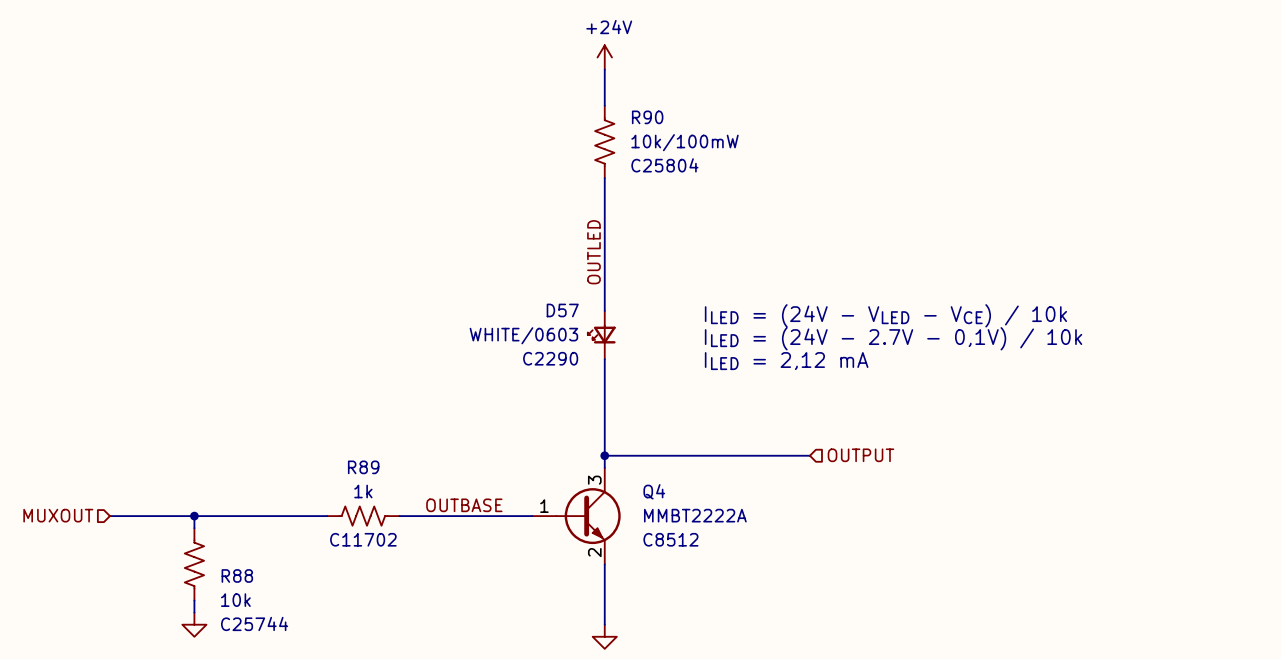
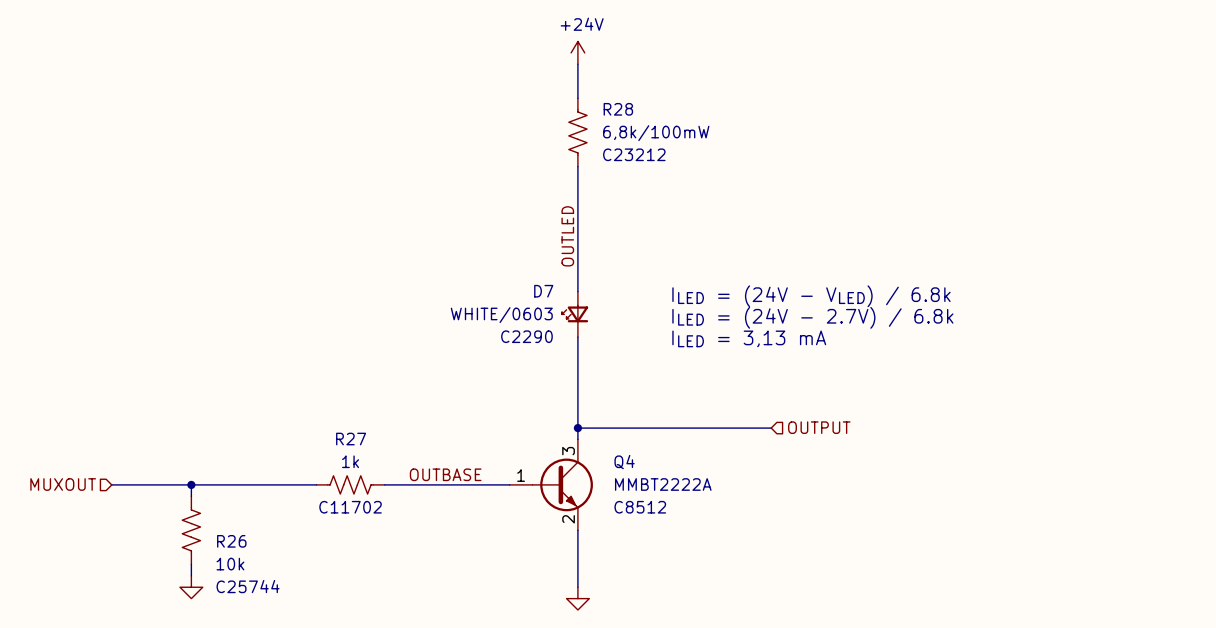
R90 name: R90 (647, 117) -> R28 (618, 109)
R90 value: 10k/100mW (685, 142) -> 6,8k/100mW (656, 133)
R90 text: C25804 (664, 165) -> C23212 (634, 154)
D57 name: D57 (562, 310) -> D7 (543, 291)
text: ILED = (24V - VLED - VCE) / 10k (885, 315) -> ILED = (24V - VLED) / 6.8k (811, 296)
text: ILED = (24V - 2.7V - 0,1V) / 10k (893, 338) -> ILED = (24V - 2.7V) / 6.8k (812, 317)
text: ILED = 2,12 mA (786, 361) -> ILED = 3,13 mA (749, 338)
R89 name: R89 (363, 467) -> R27 (351, 439)
R88 name: R88 (237, 575) -> R26 (231, 541)

